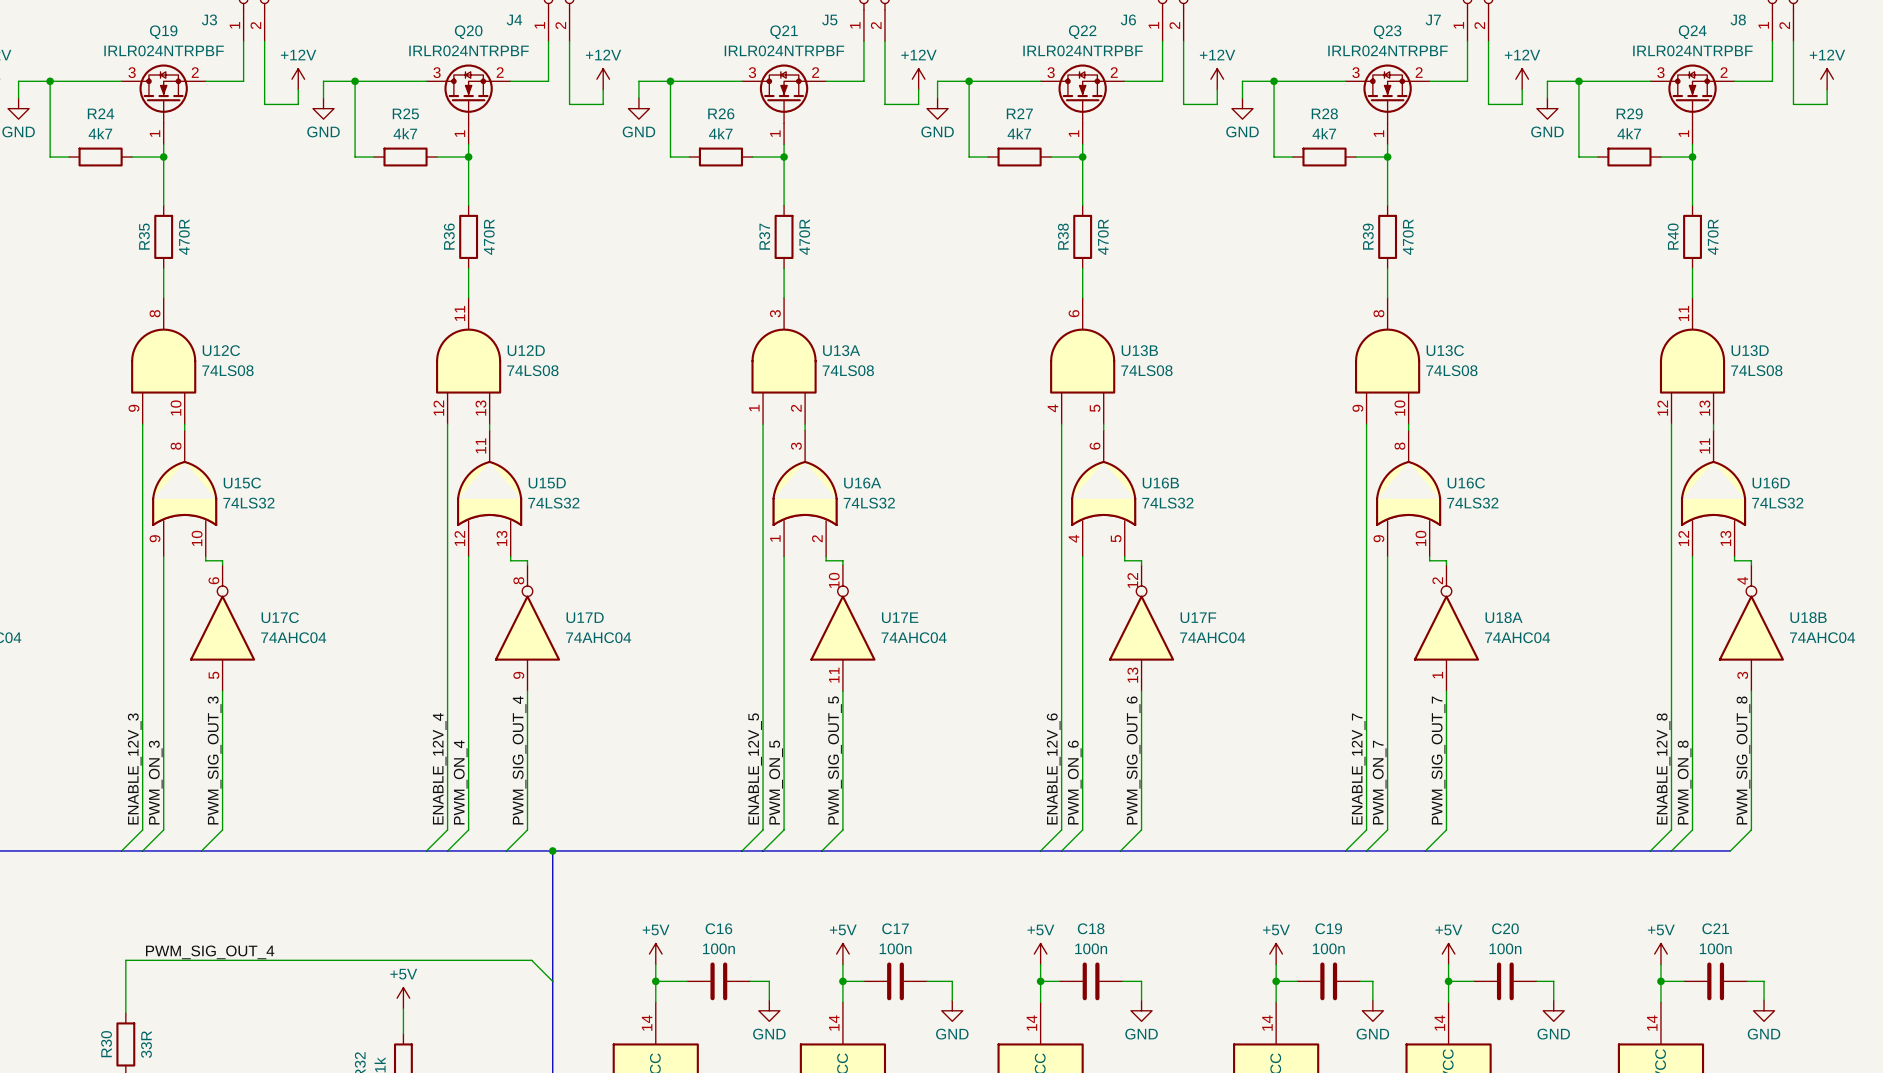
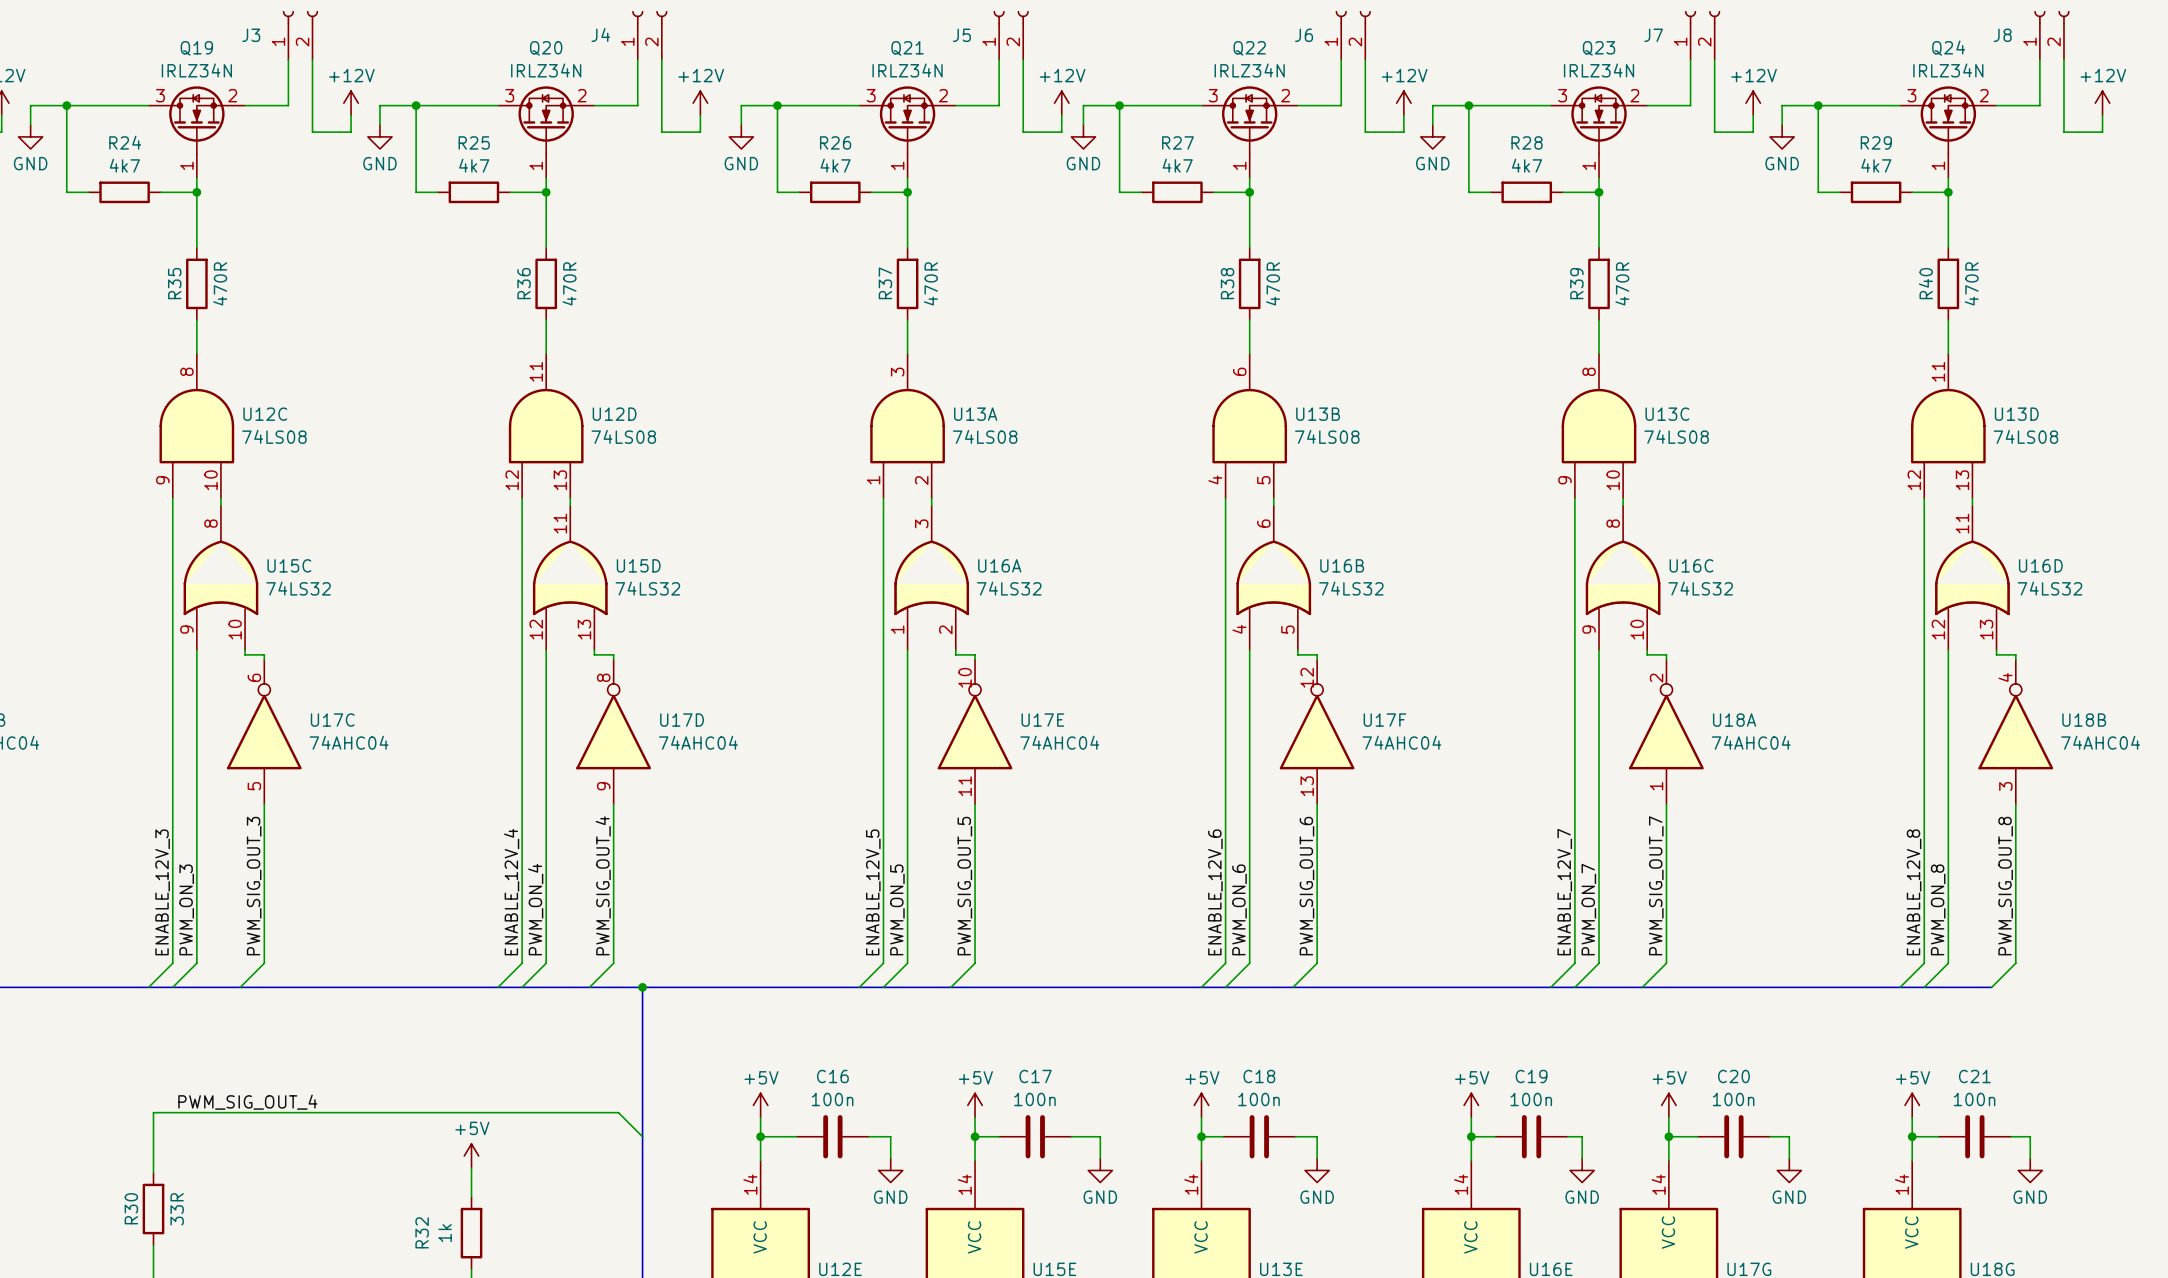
Q19 value: IRLR024NTRPBF (164, 50) -> IRLZ34N (196, 70)
Q20 value: IRLR024NTRPBF (469, 50) -> IRLZ34N (546, 70)
Q21 value: IRLR024NTRPBF (784, 50) -> IRLZ34N (907, 70)
Q22 value: IRLR024NTRPBF (1083, 50) -> IRLZ34N (1249, 70)
Q23 value: IRLR024NTRPBF (1387, 50) -> IRLZ34N (1599, 70)
Q24 value: IRLR024NTRPBF (1692, 50) -> IRLZ34N (1948, 70)

